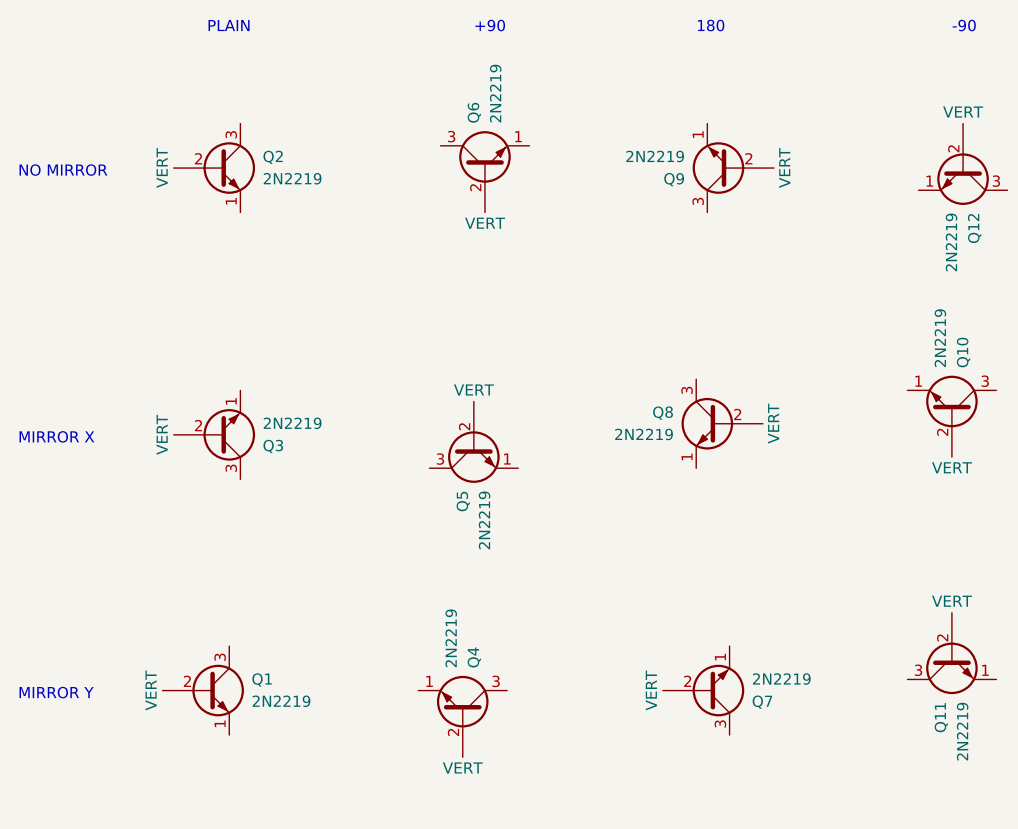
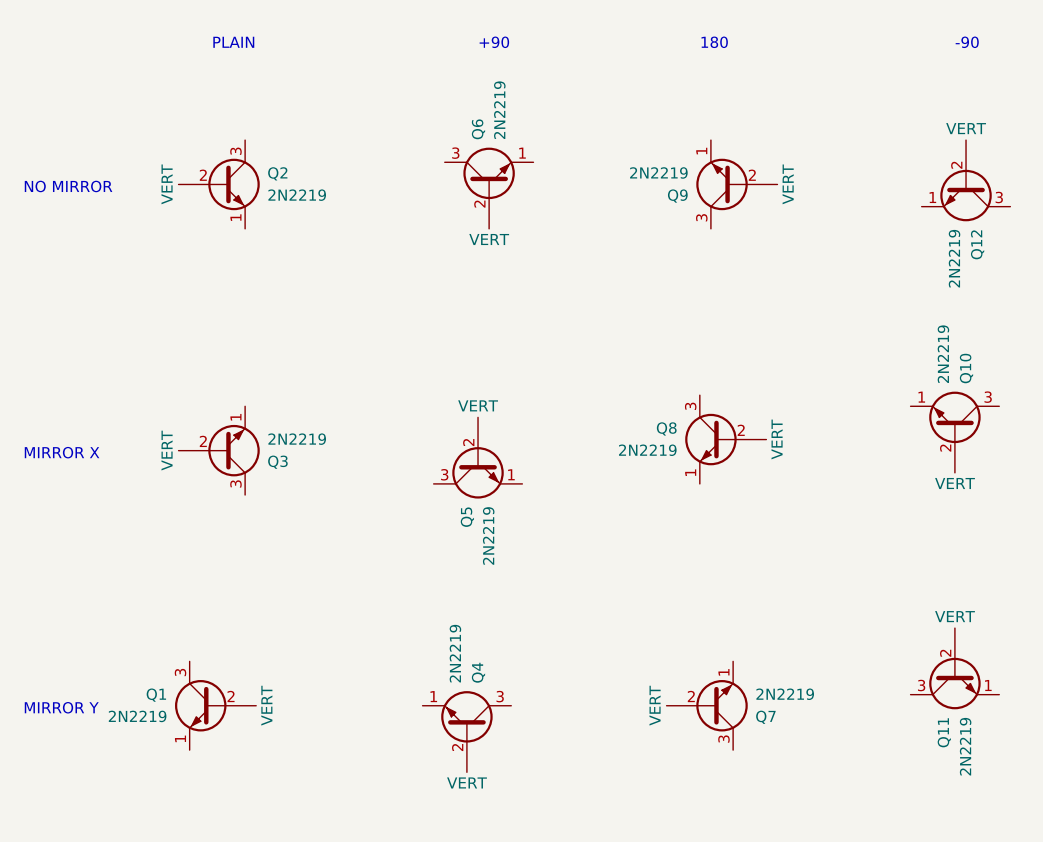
Q1 flip: as is (218, 690) -> left-right (200, 705)

